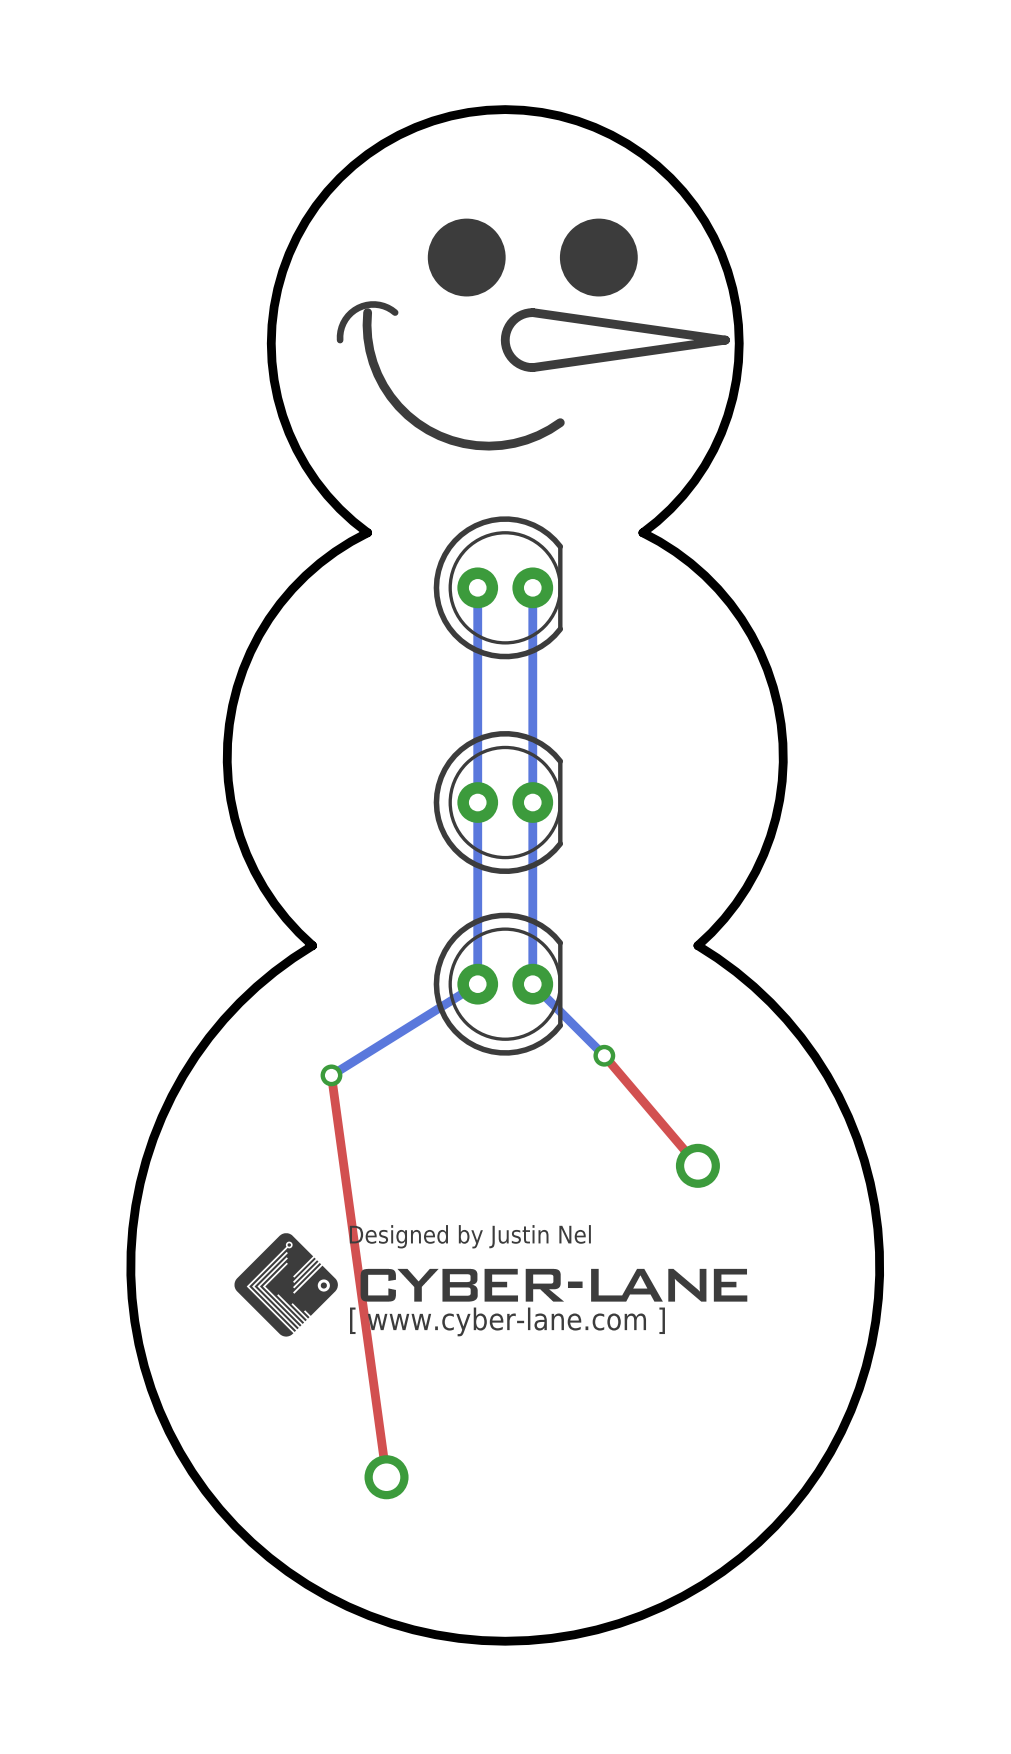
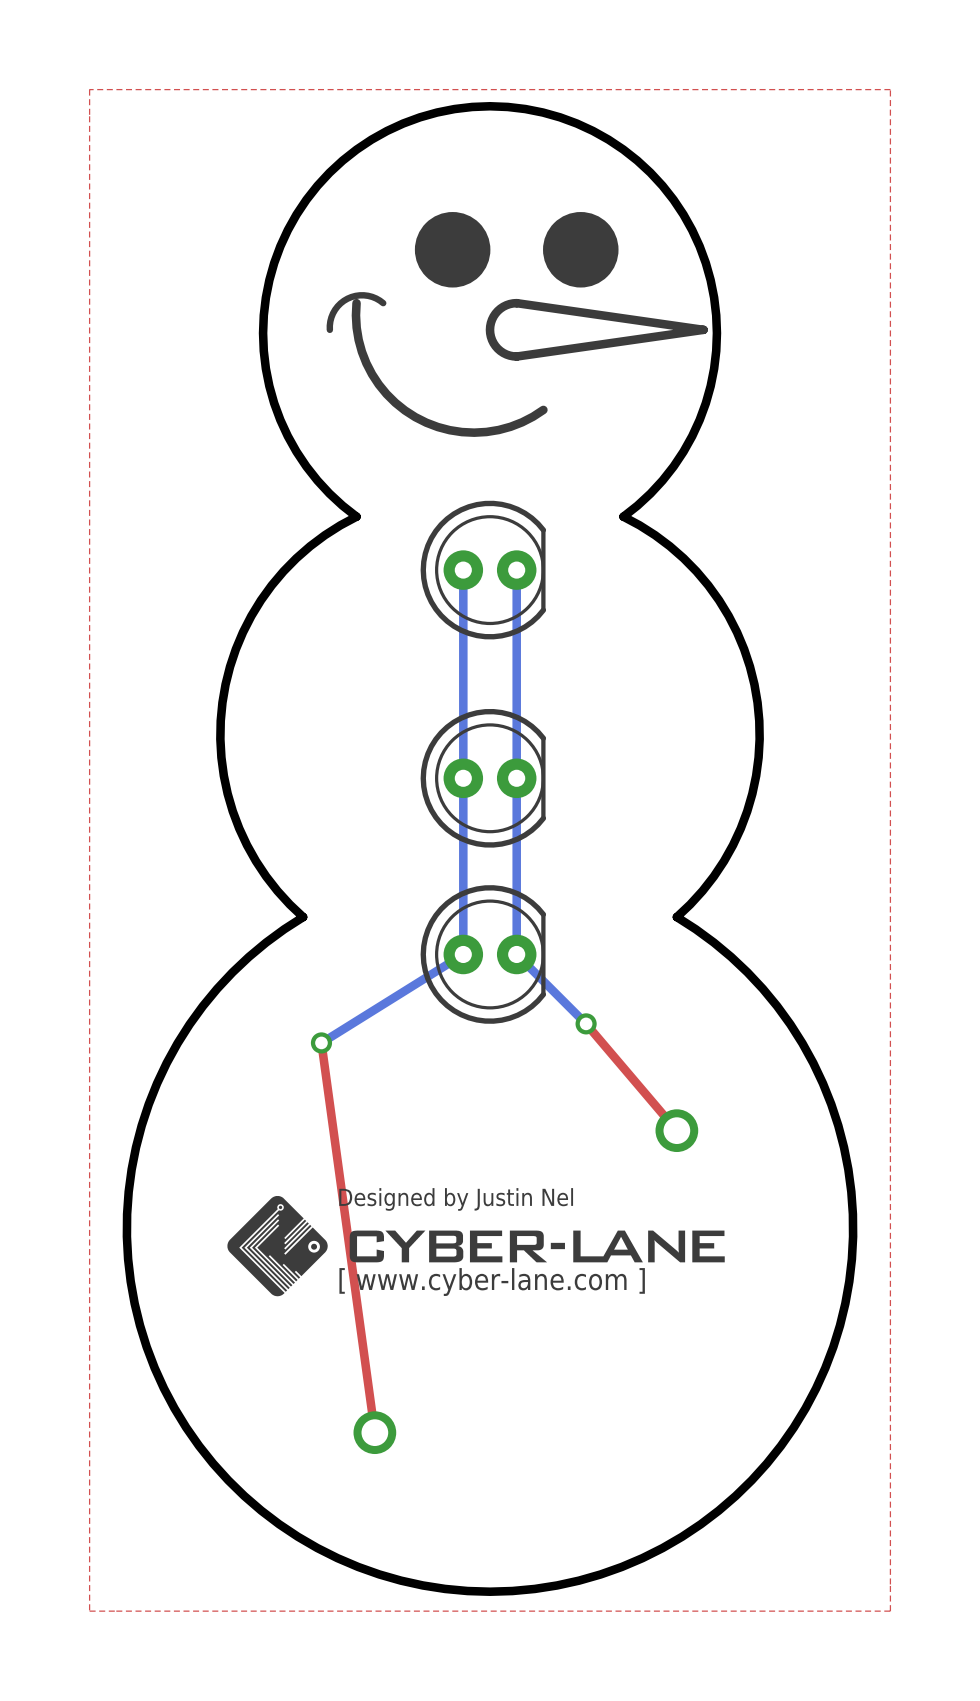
top zone outline: none -> (89, 89) (890, 89) (890, 1611) (89, 1611) (89, 89)

